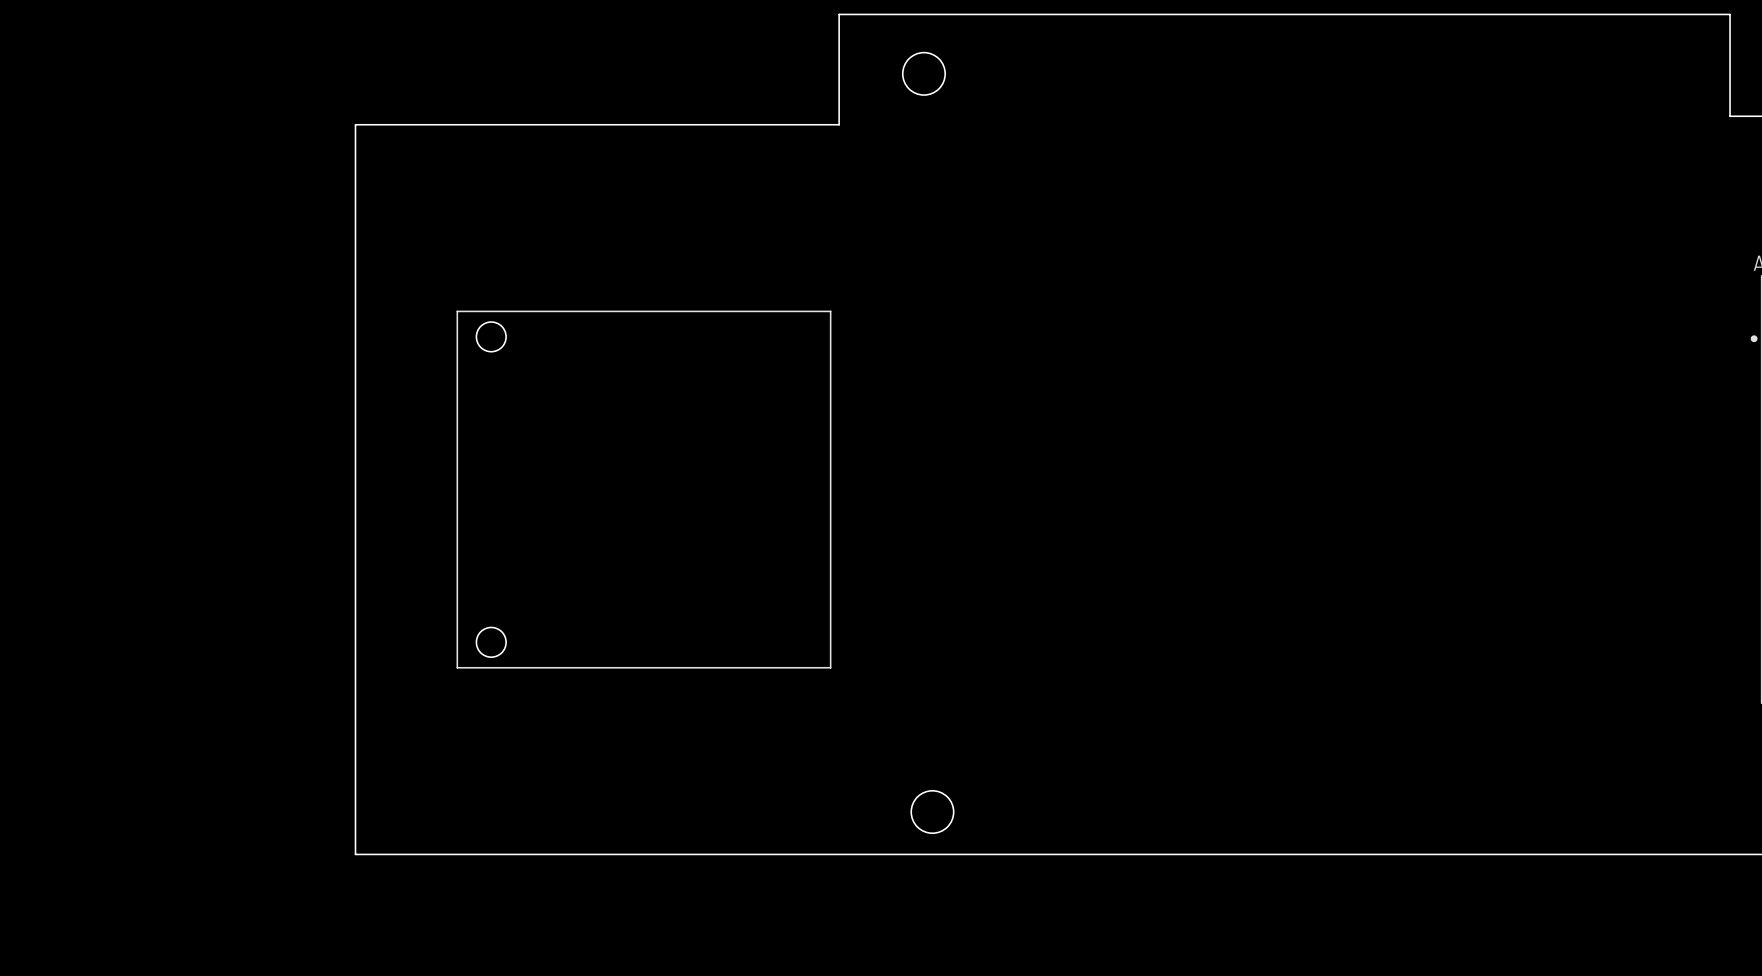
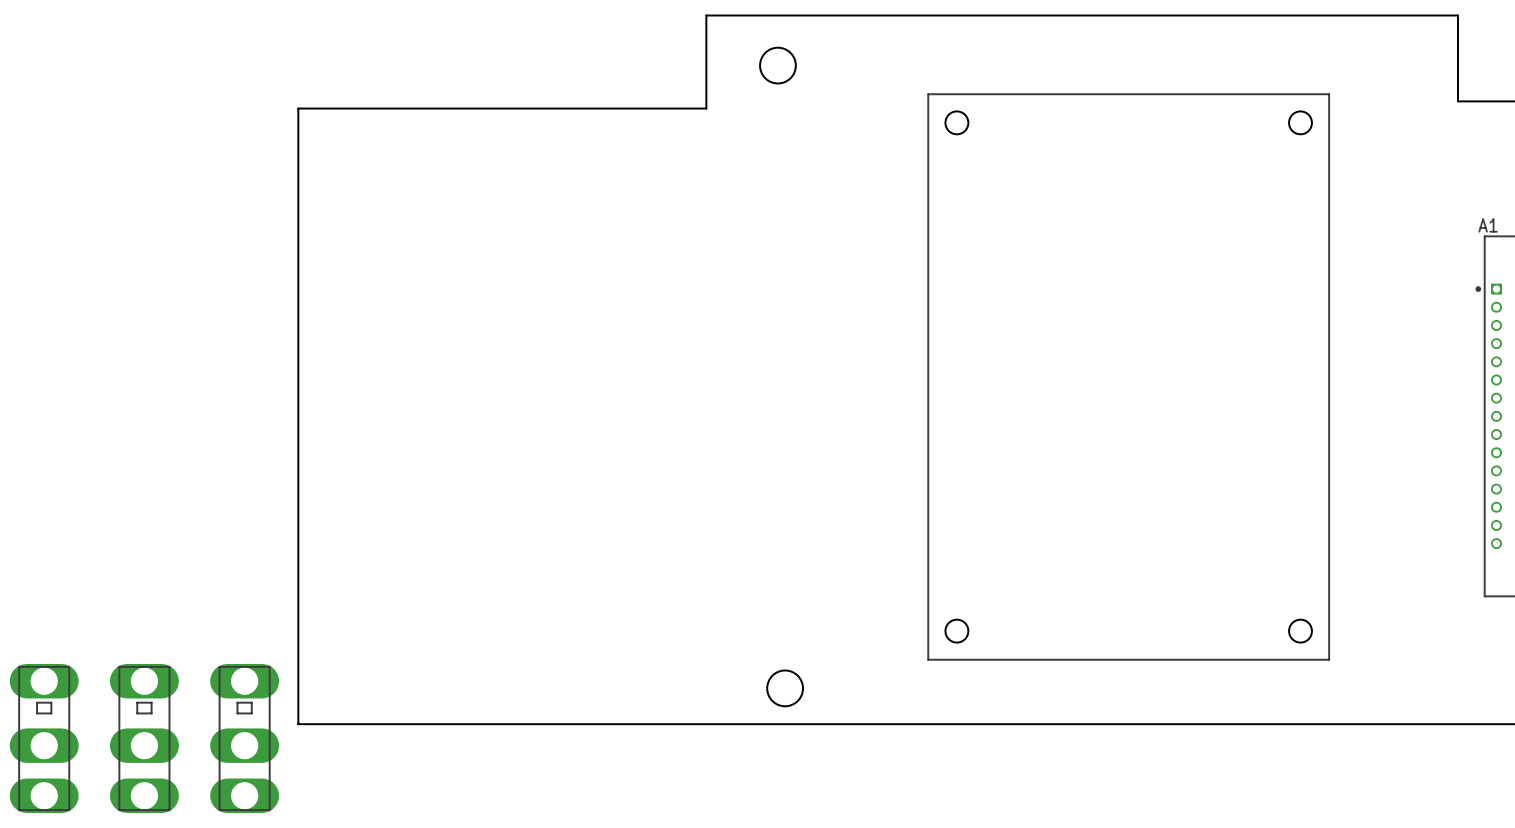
part: none -> (1128, 376)
part: (643, 489) -> none
part: none -> (44, 738)
part: none -> (144, 738)
part: none -> (244, 738)

